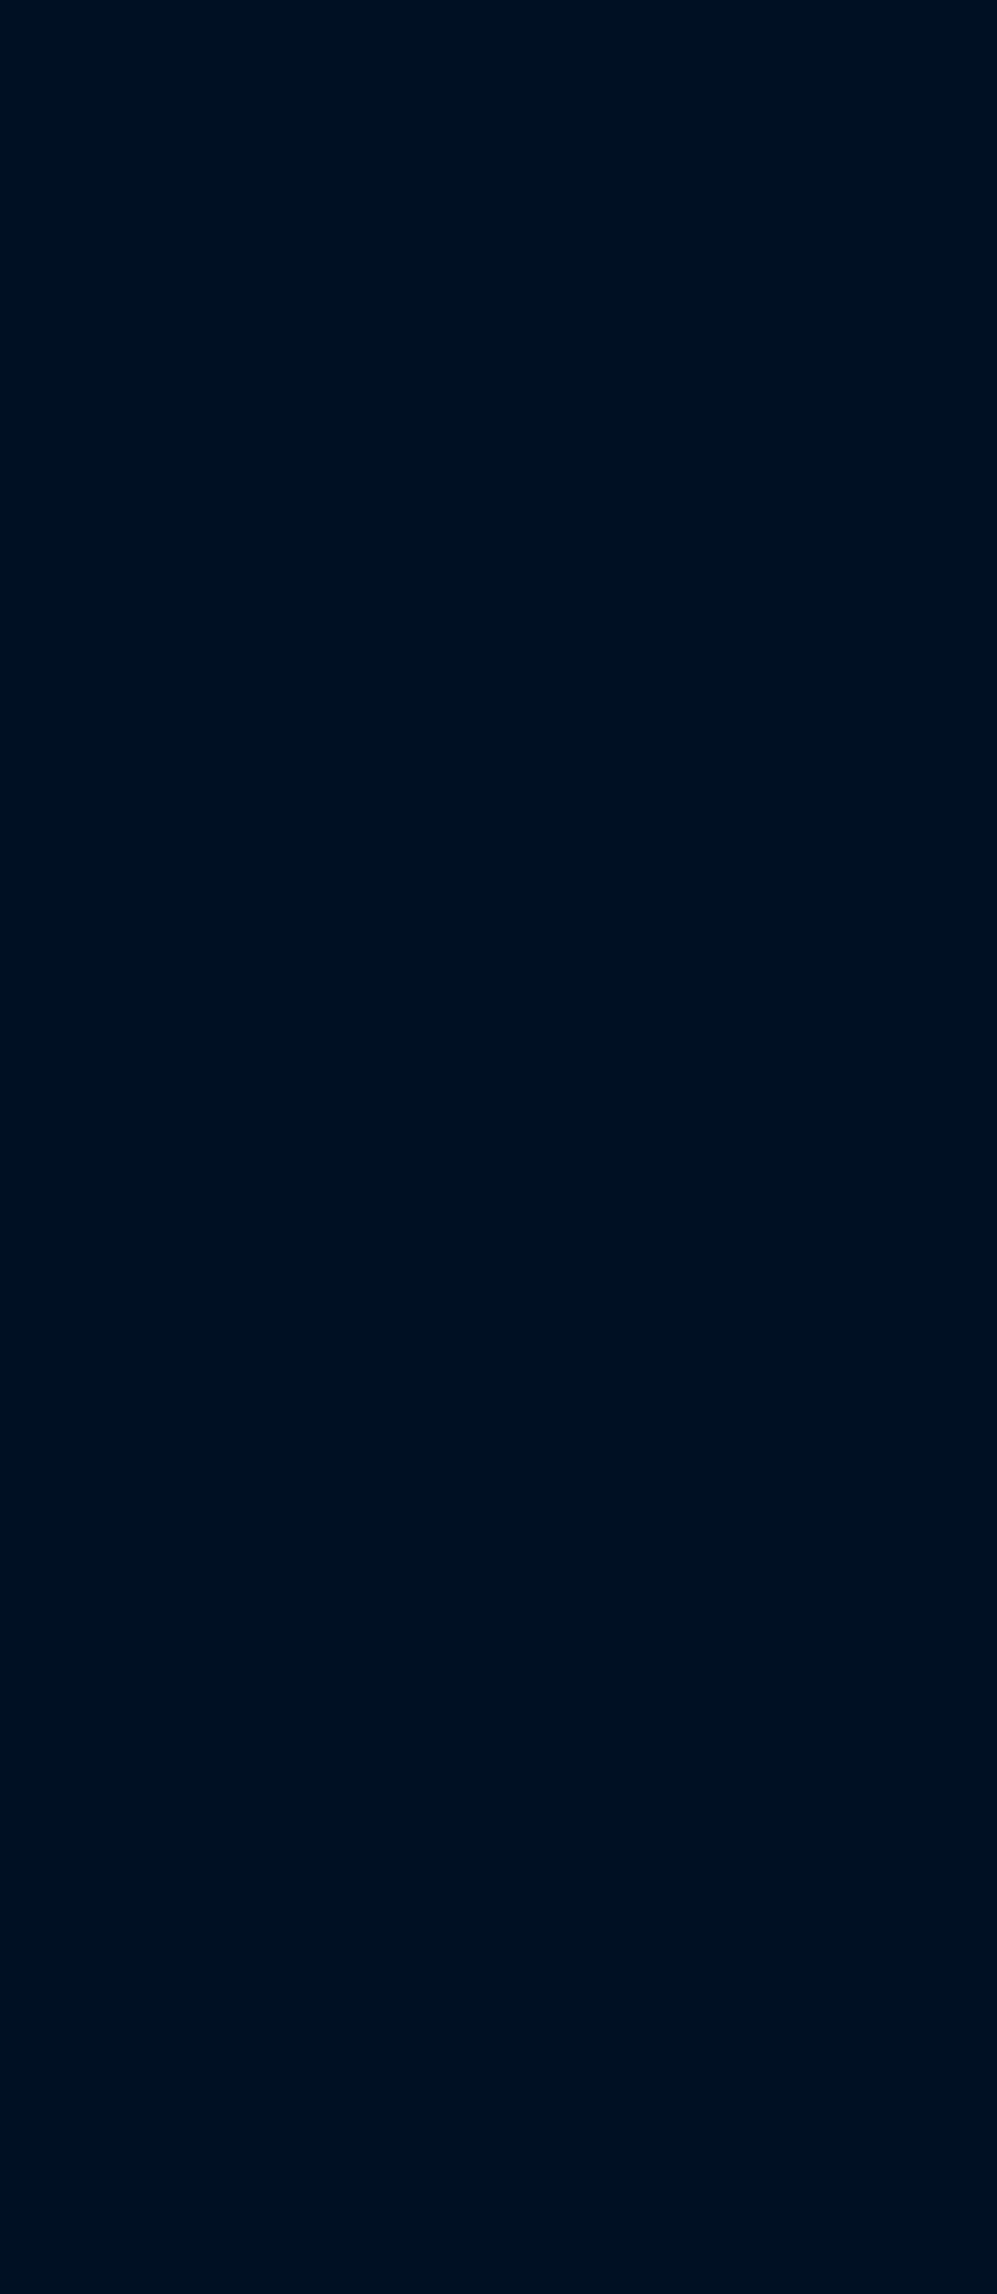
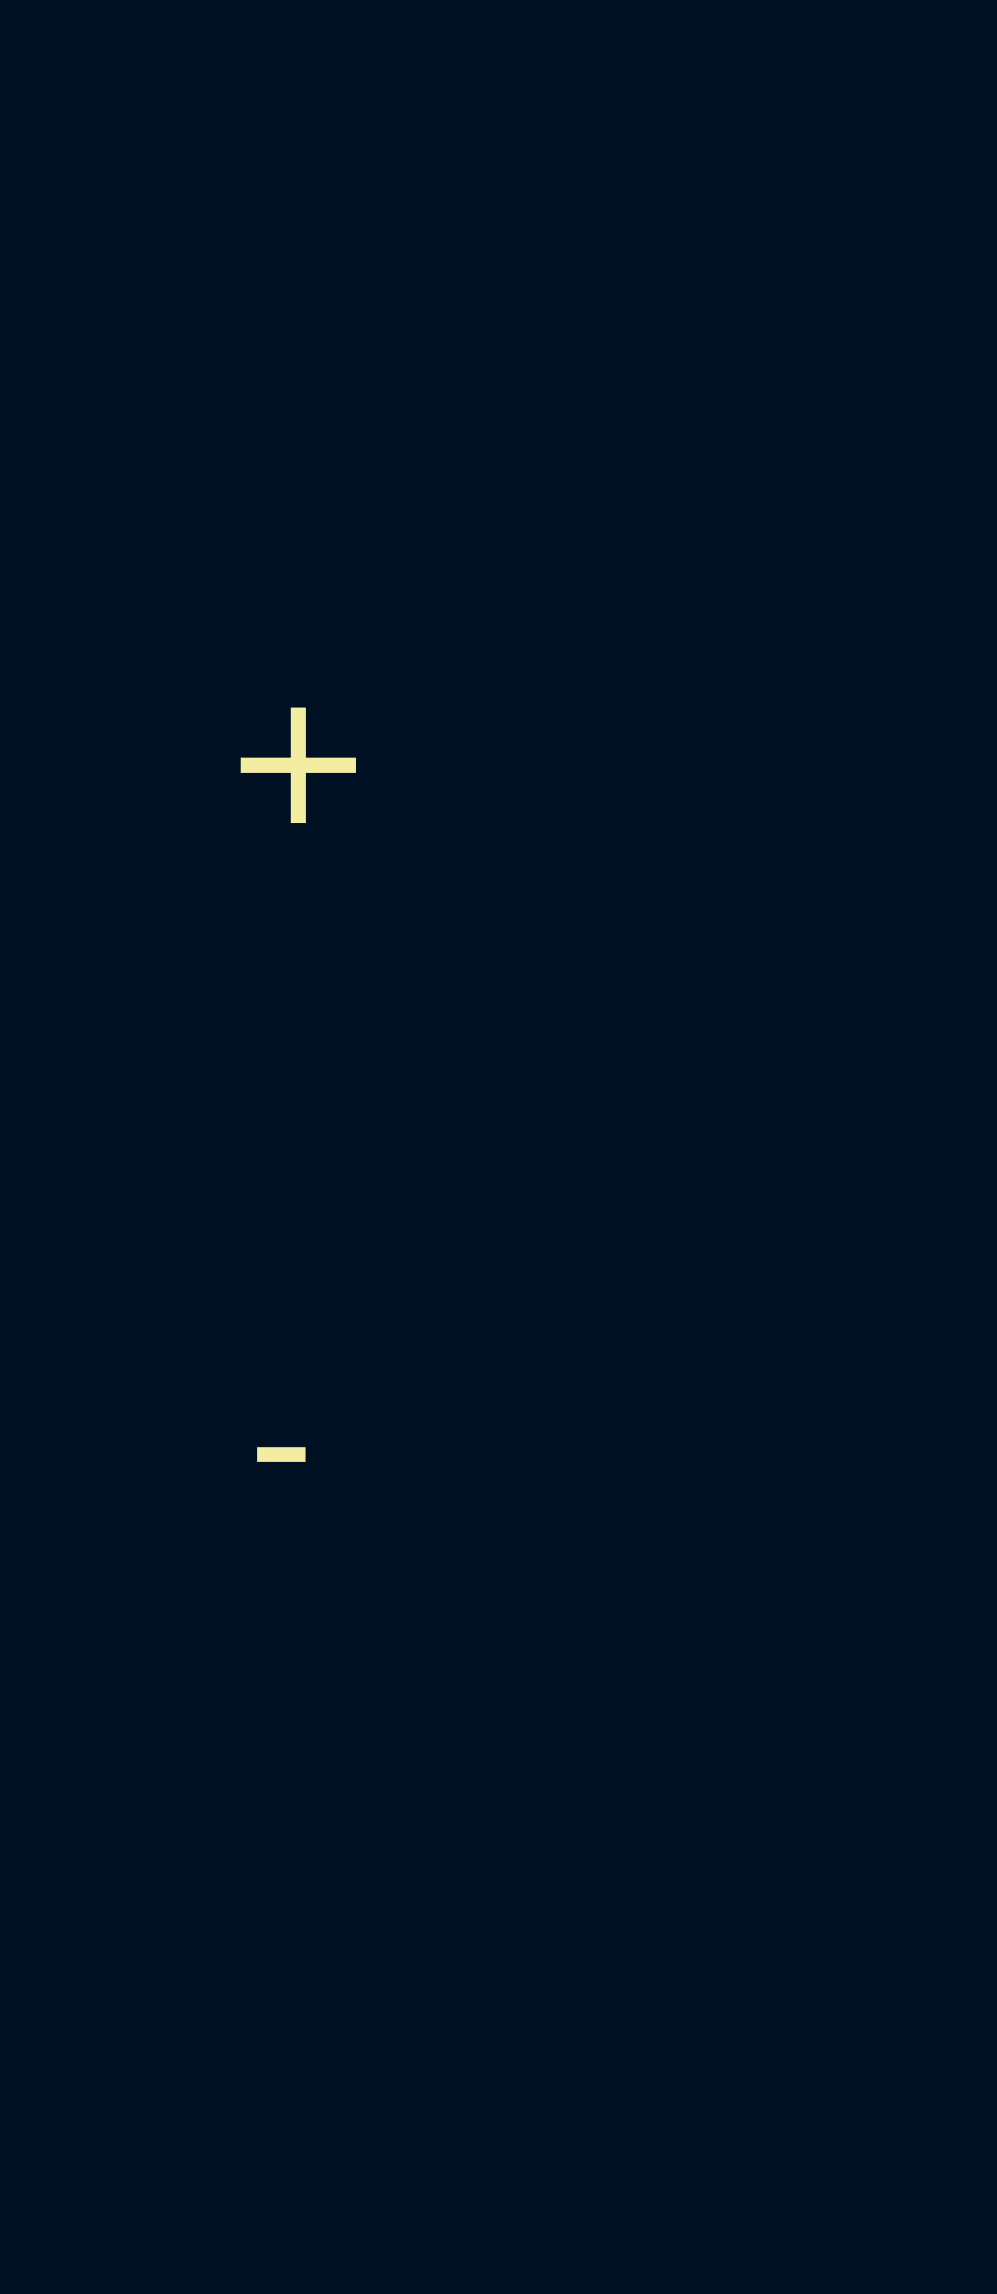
text: none -> + (298, 765)
text: none -> - (281, 1454)

